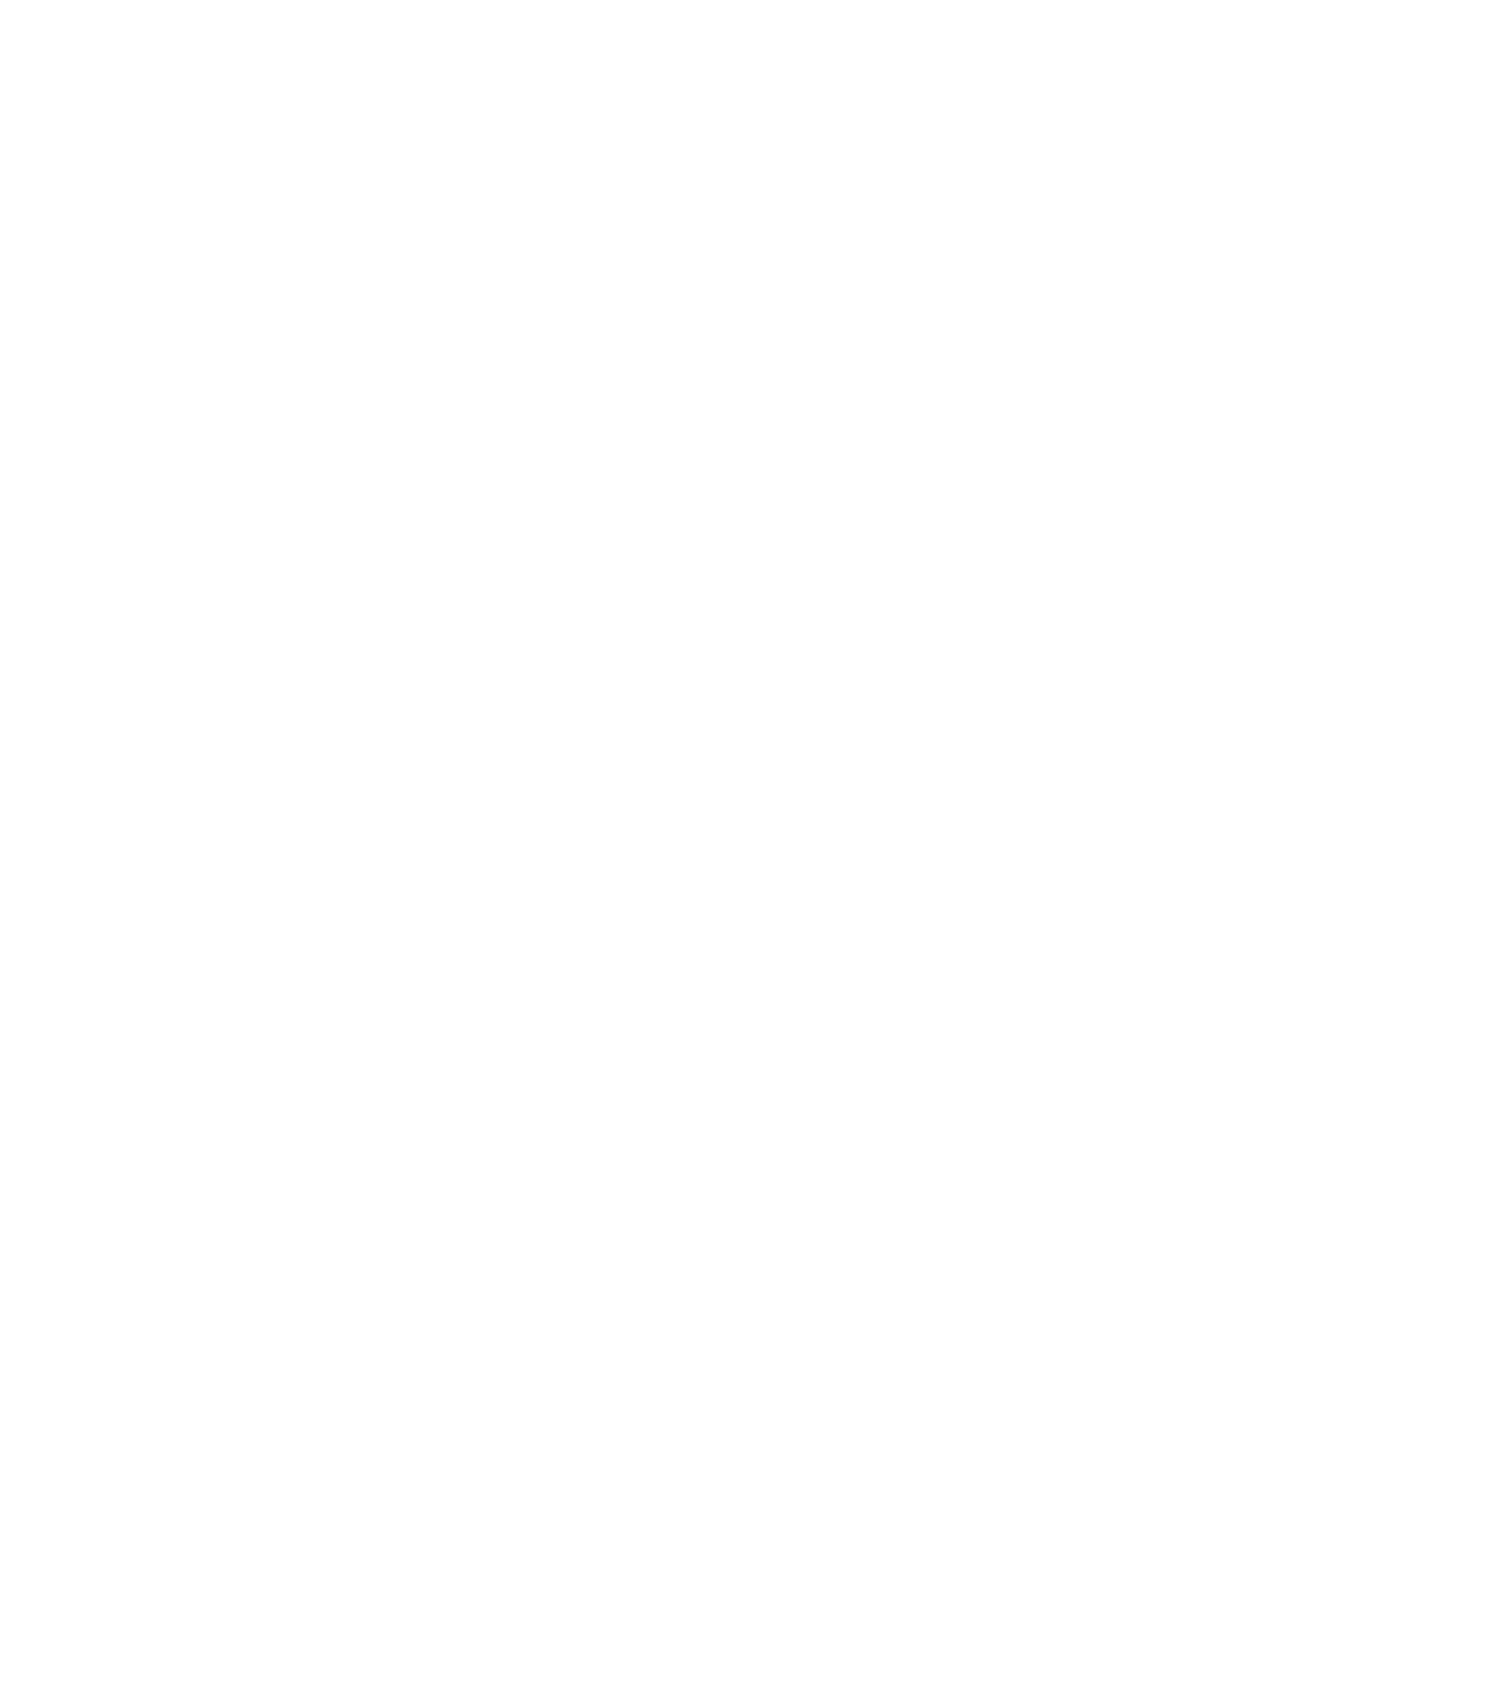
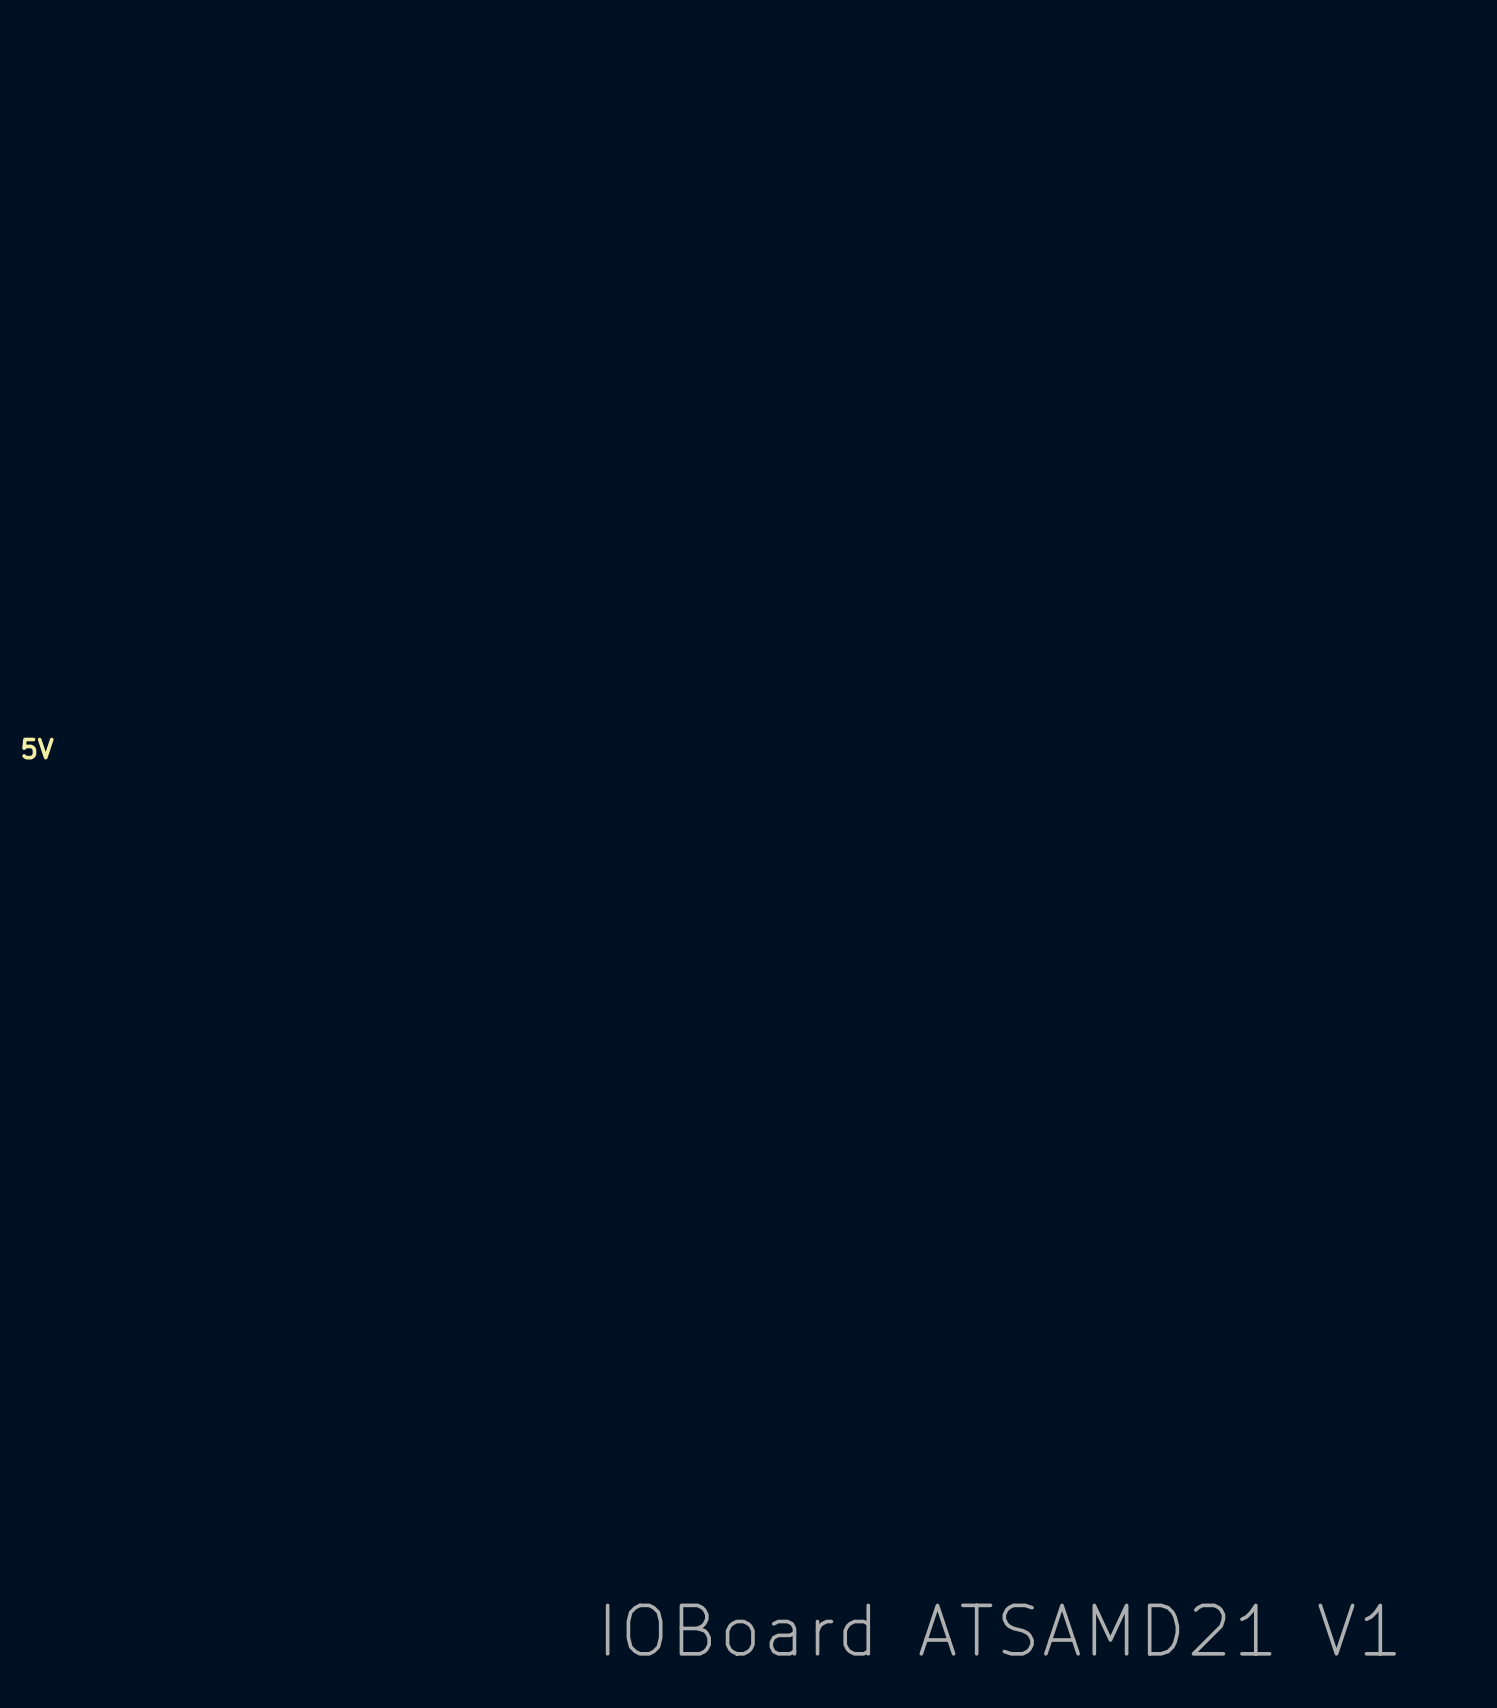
text: none -> 5V (37, 748)
text: none -> IOBoard ATSAMD21 V1 (1000, 1629)

